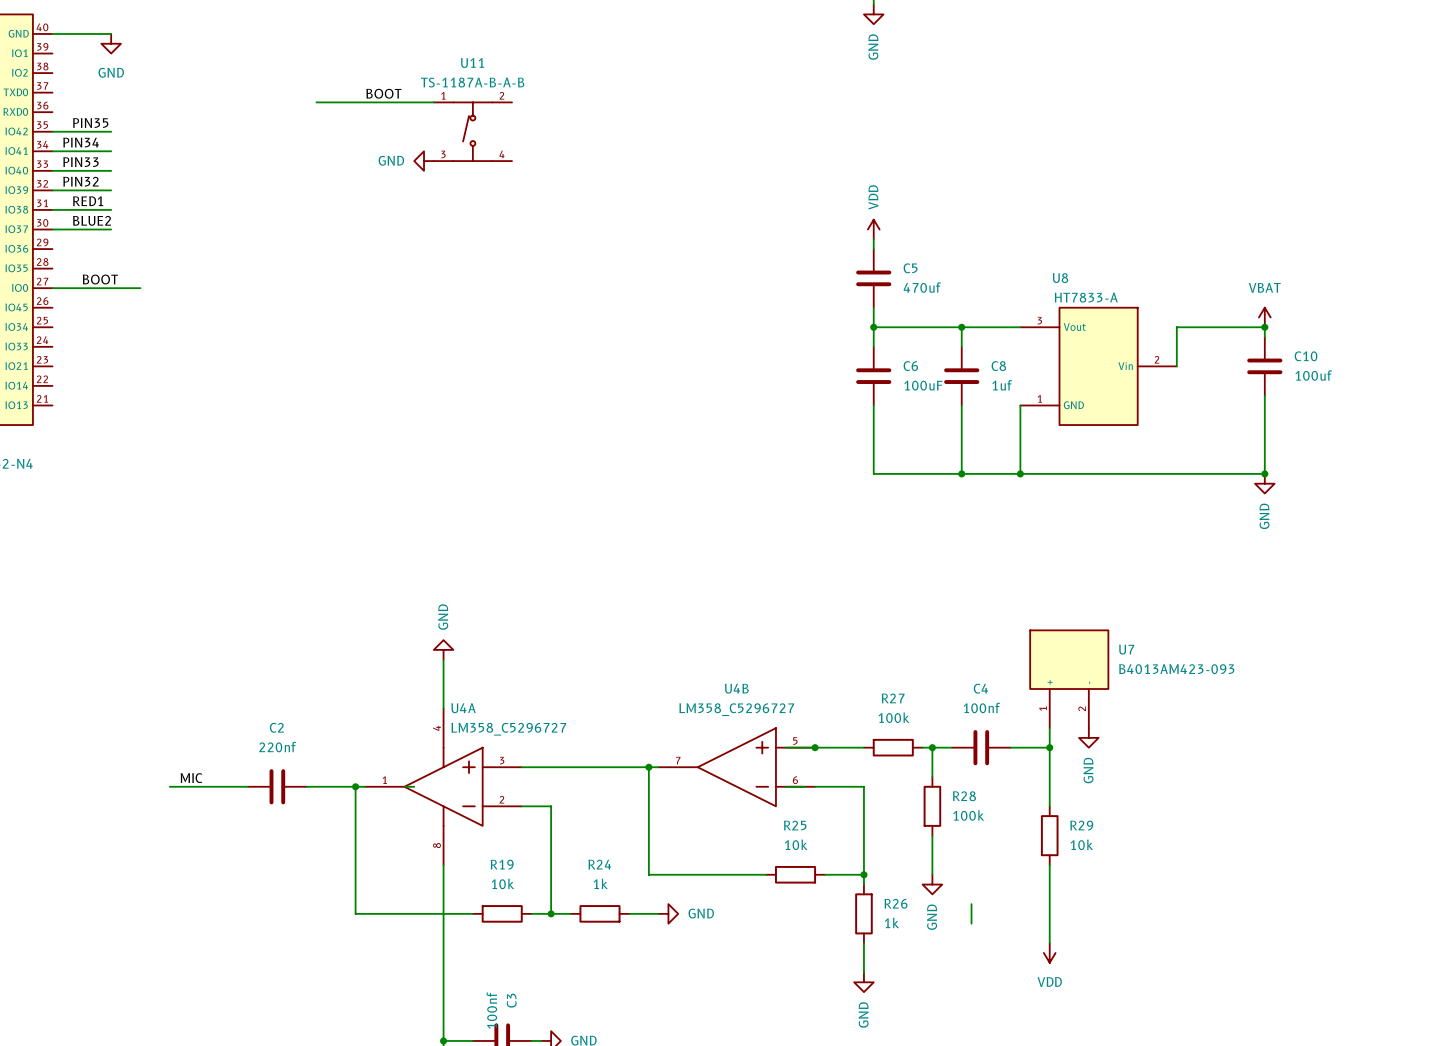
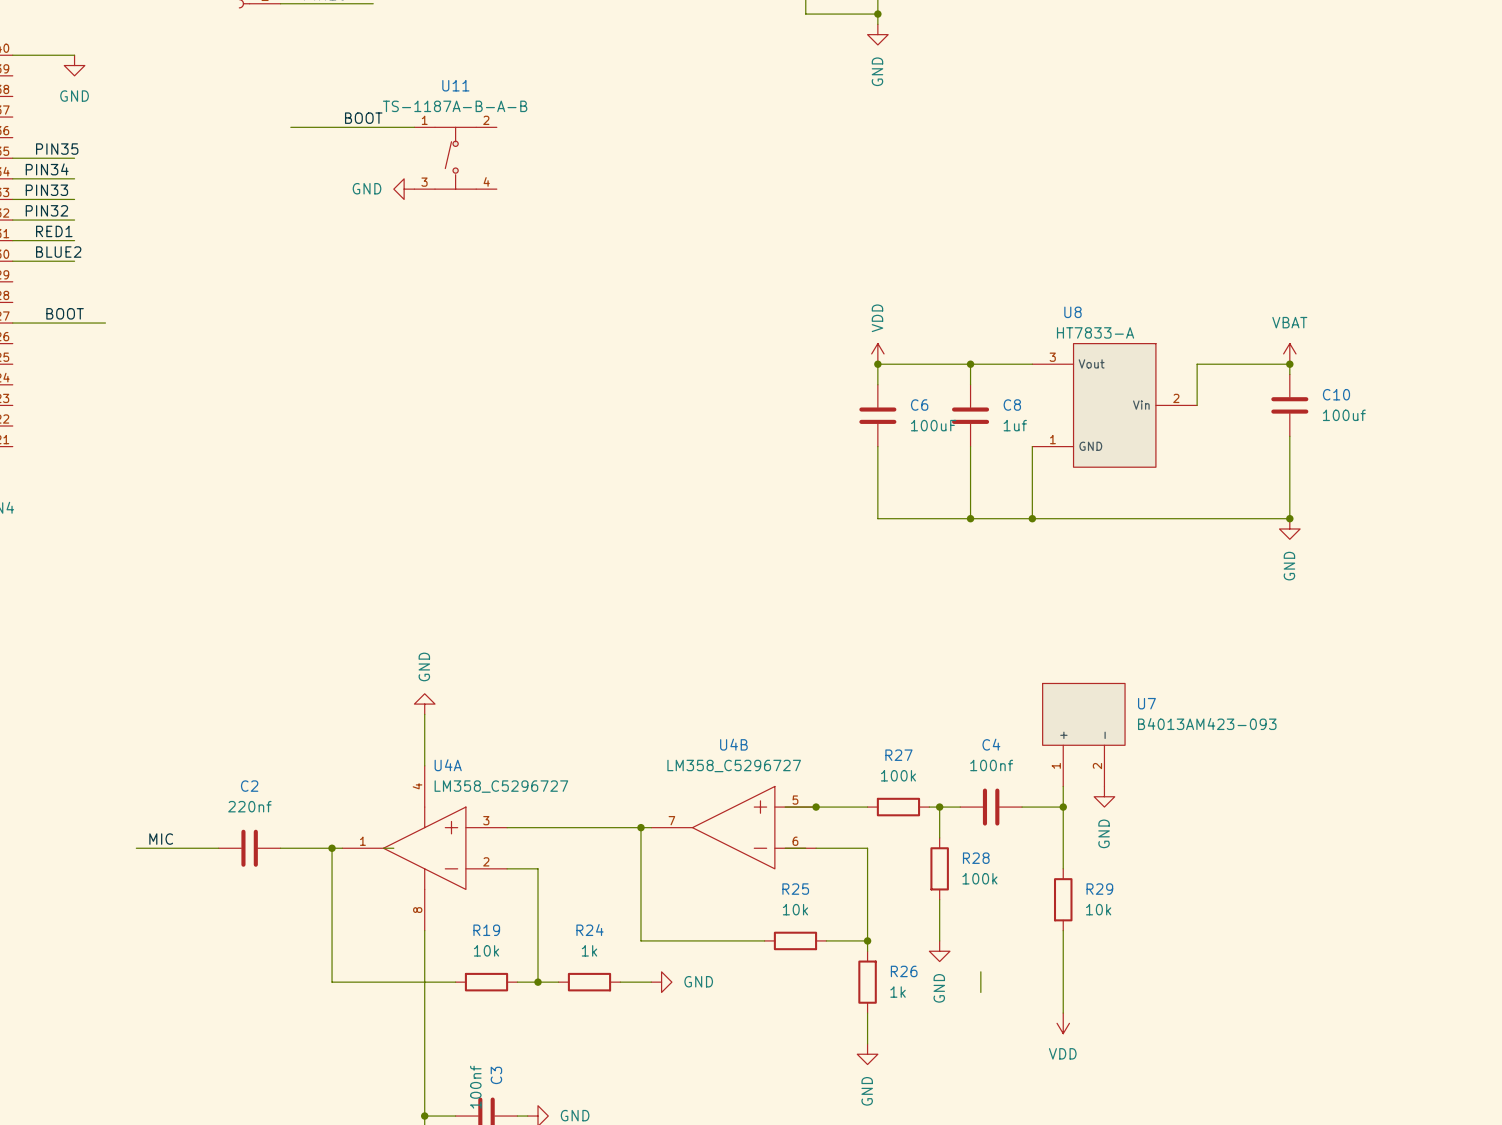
power symbol position: VDD (873, 229) -> VDD (877, 353)
wire: (873, 239) (873, 249) -> none
C5: 470uf (873, 278) -> none

